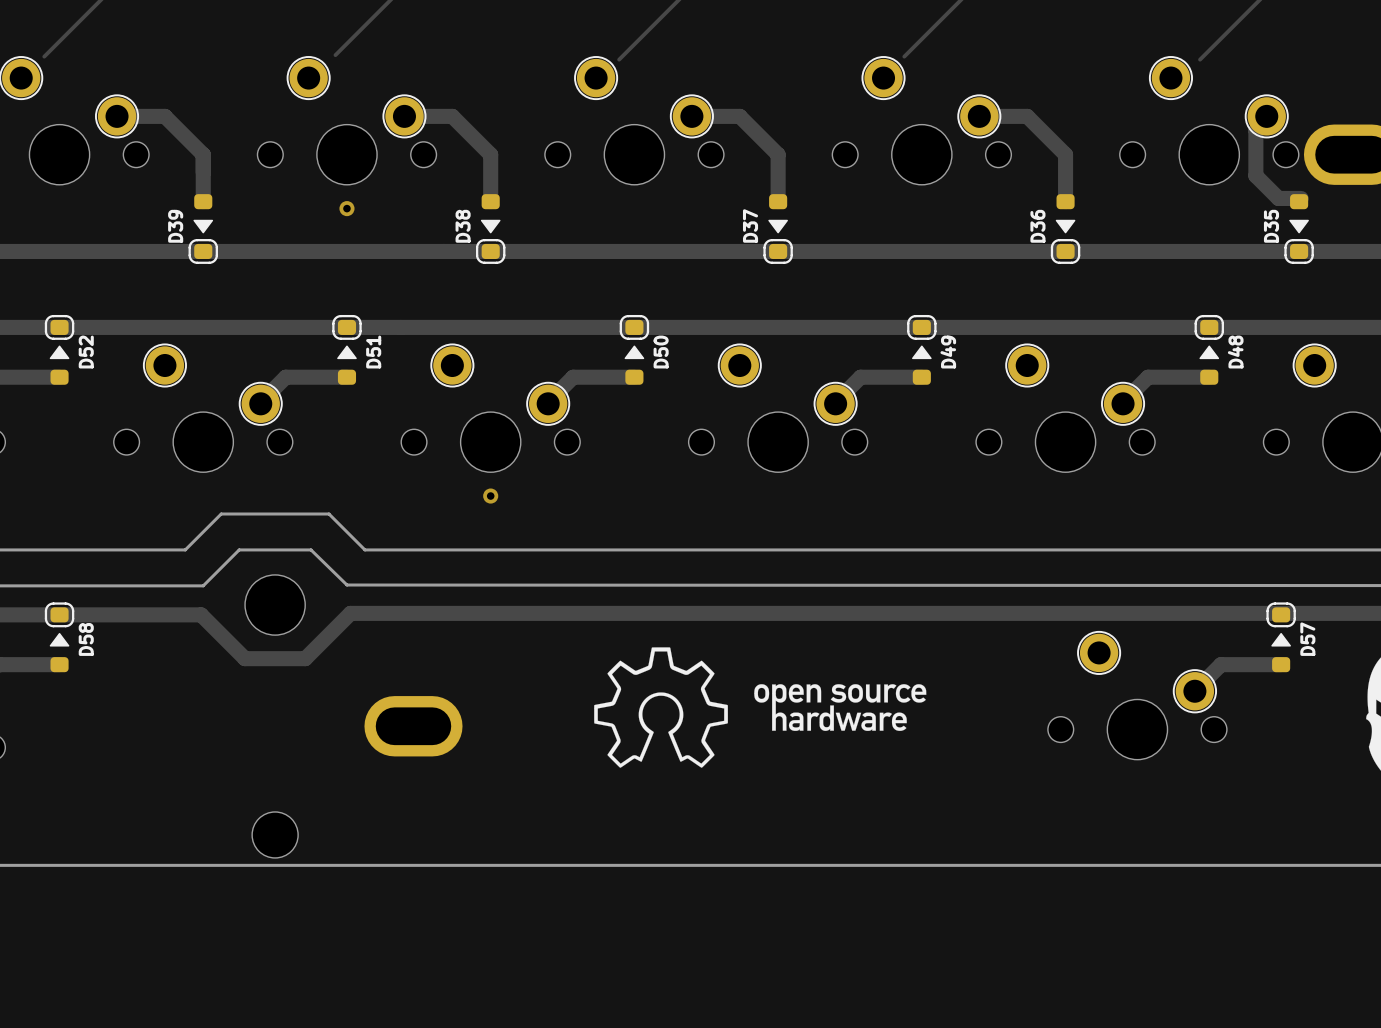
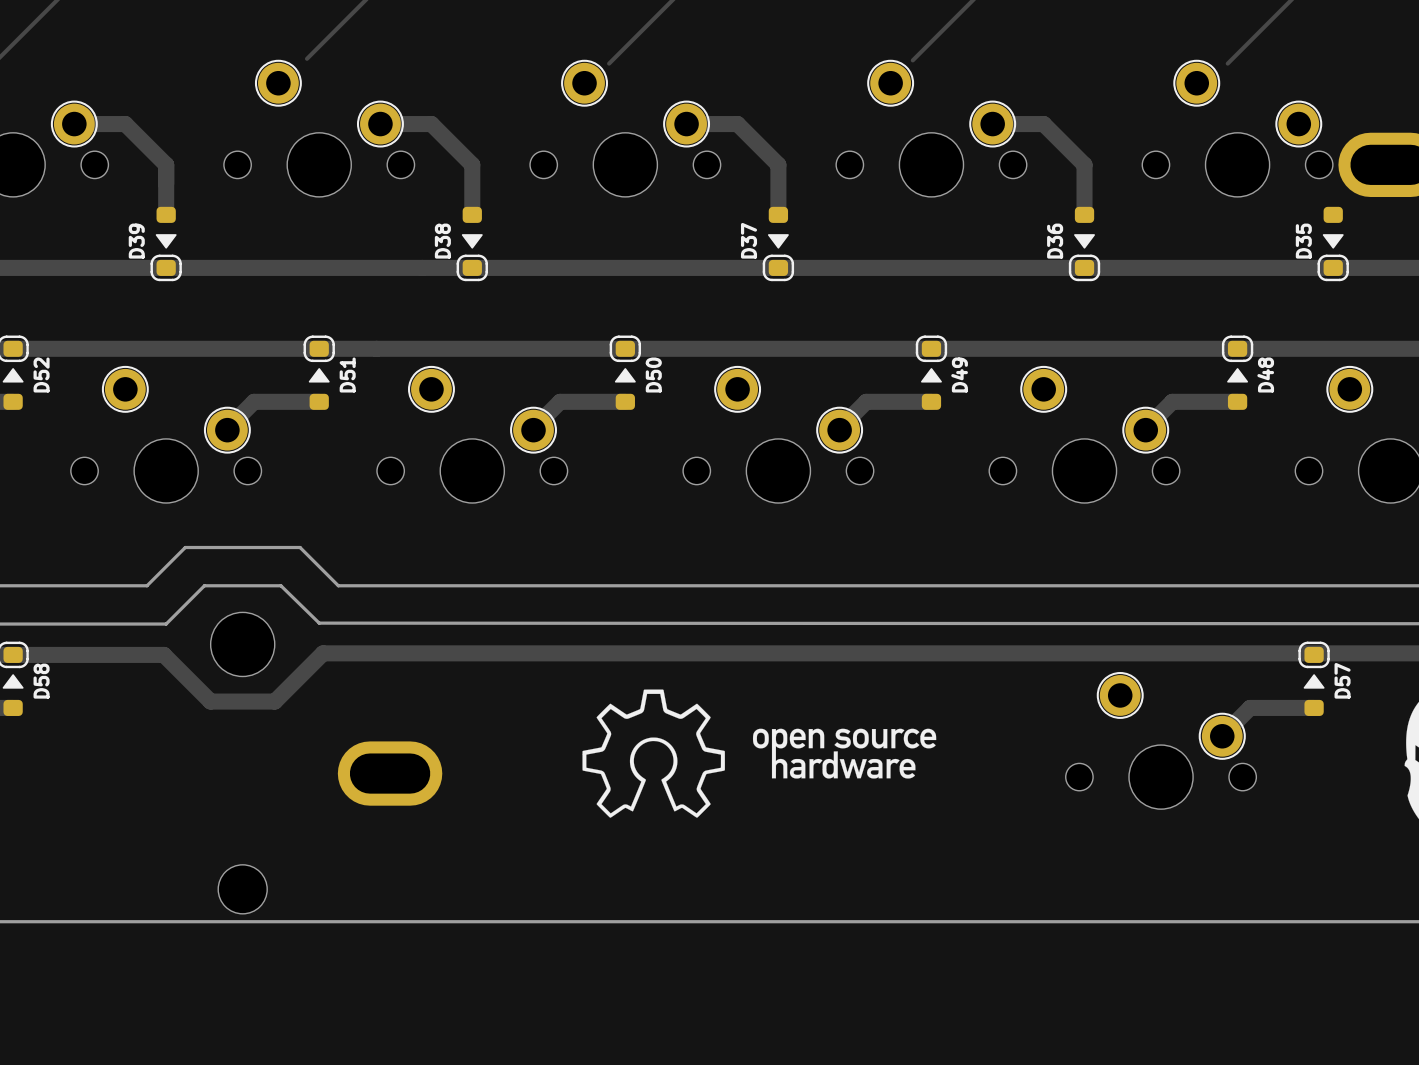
track: (1266, 116) (1266, 119) (1255, 130) (1255, 175) (1278, 198) (1301, 198) -> none
via: (346, 208) -> none
via: (490, 496) -> none

